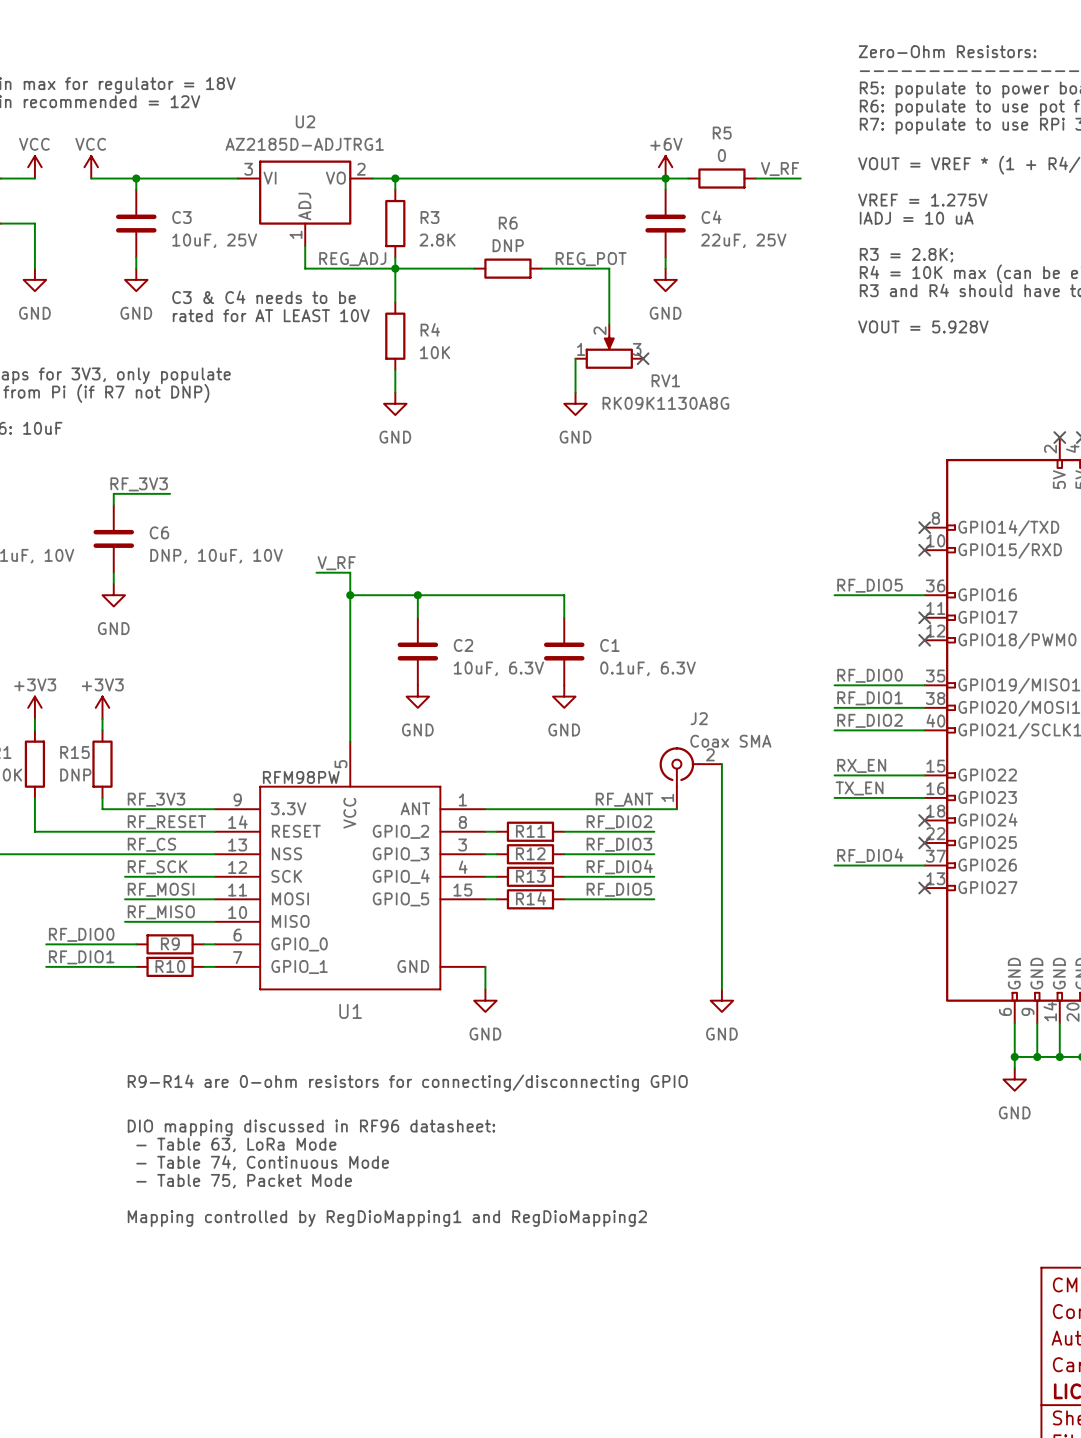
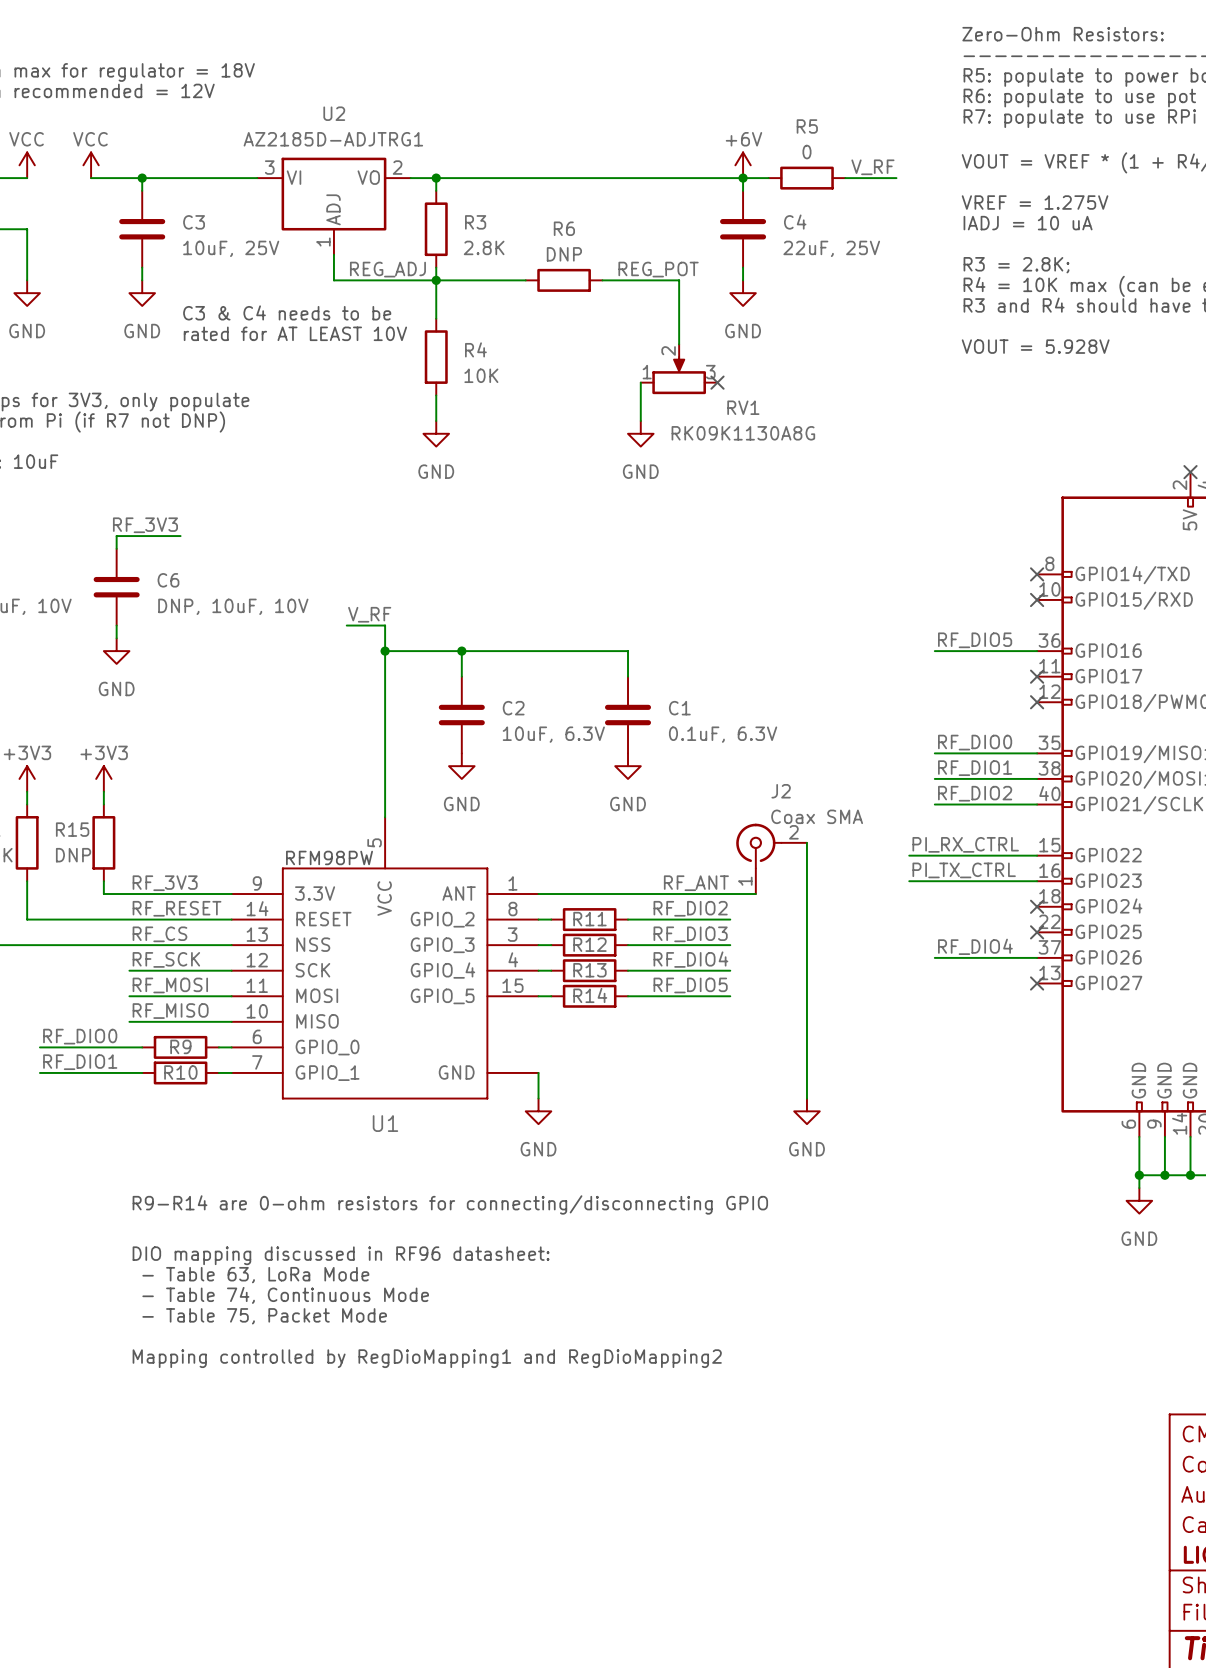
label: RX_EN (861, 765) -> none
label: none -> PI_RX_CTRL (965, 844)
wire: none -> (909, 855) (934, 855)
label: TX_EN (859, 788) -> none
label: none -> PI_TX_CTRL (964, 870)
wire: none -> (909, 881) (934, 881)

